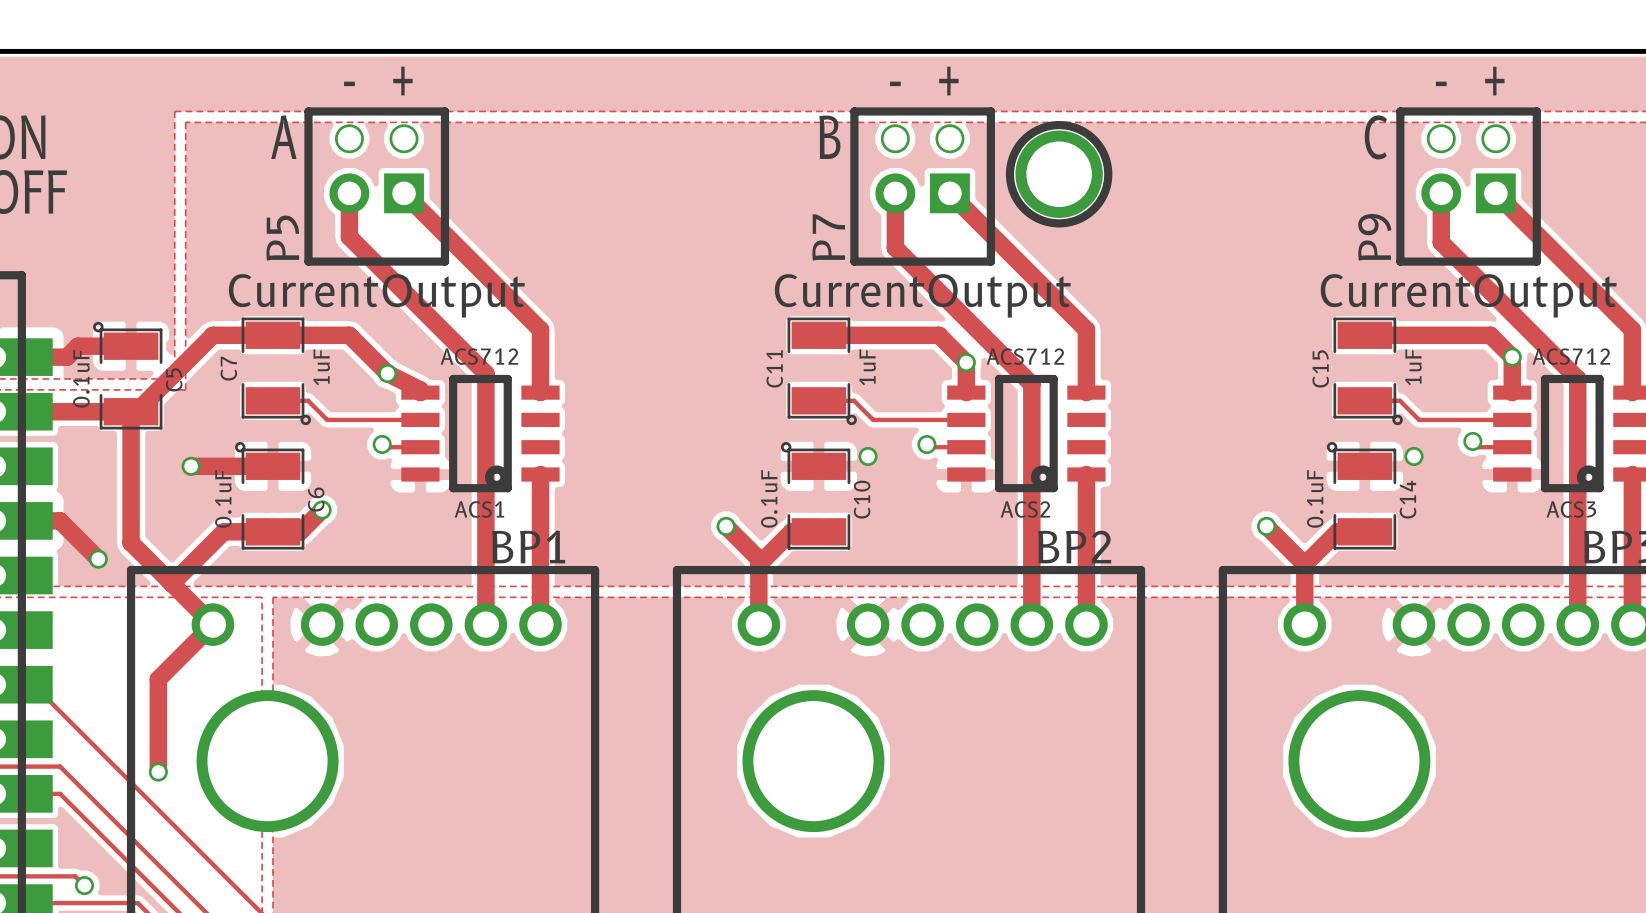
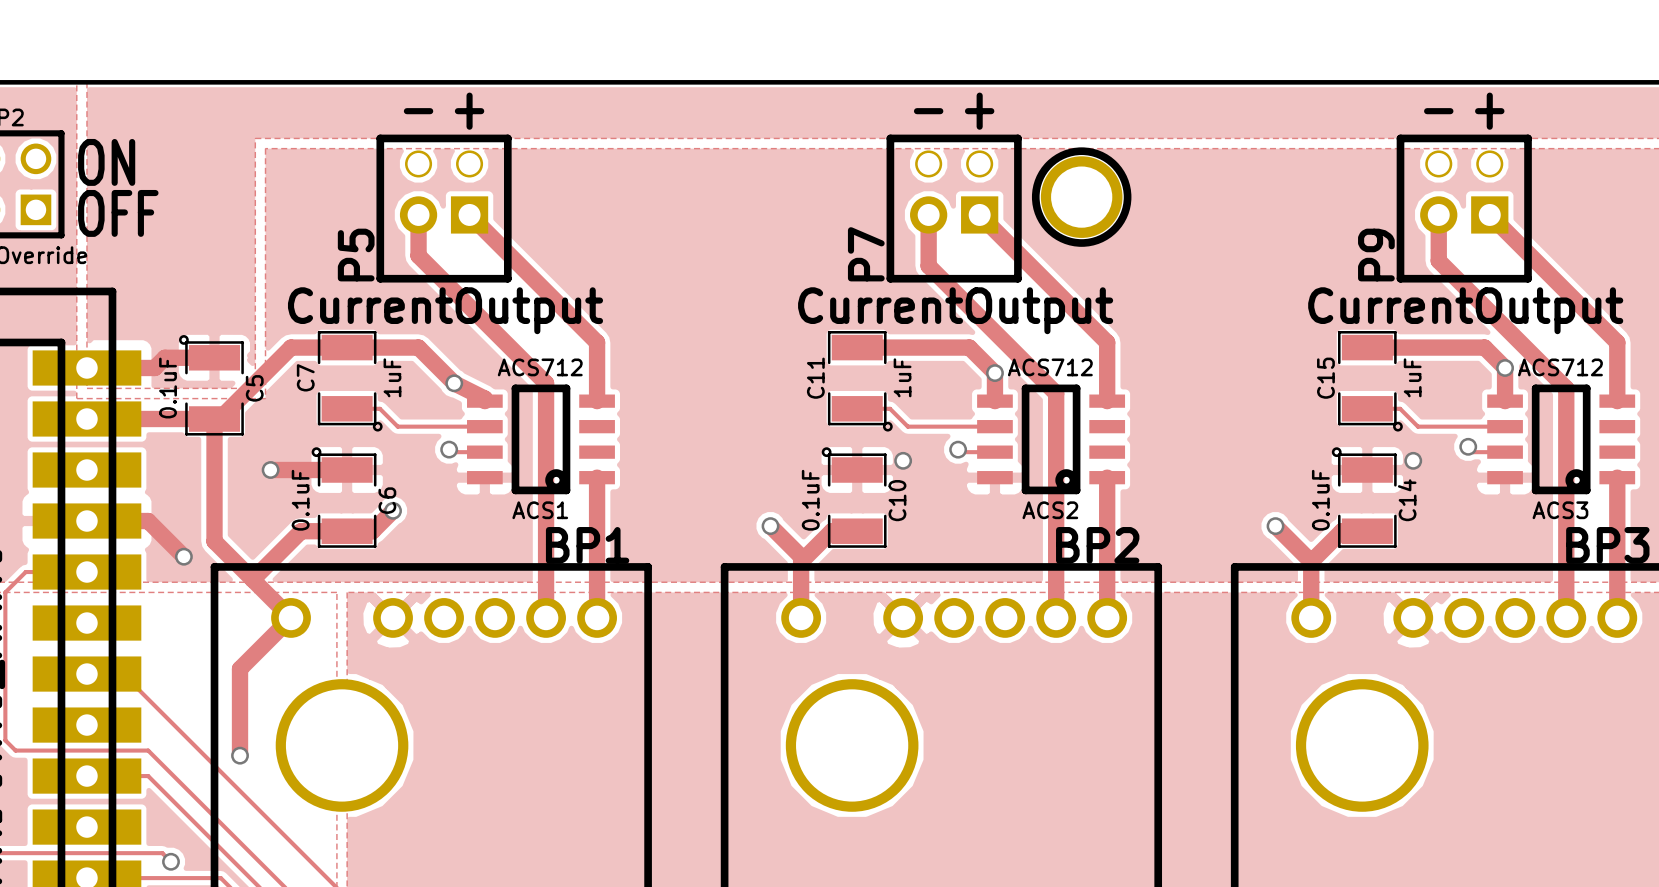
text: A (283, 137) -> none
text: B (829, 137) -> none
text: C (1375, 137) -> none

